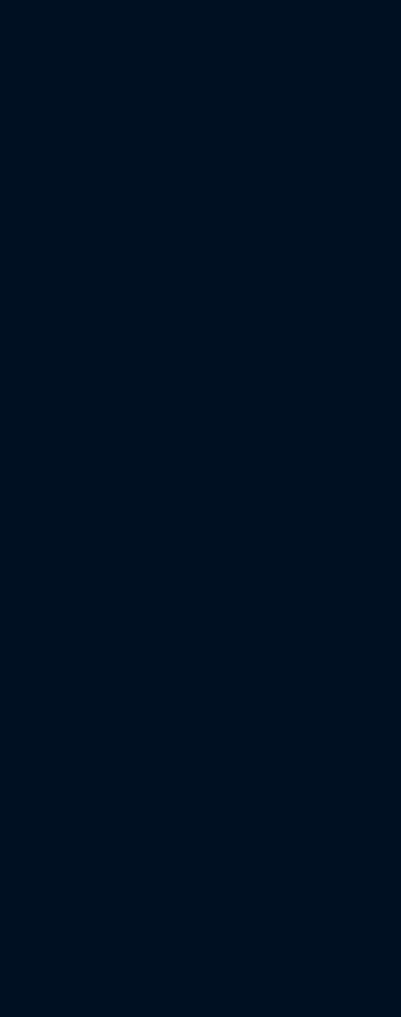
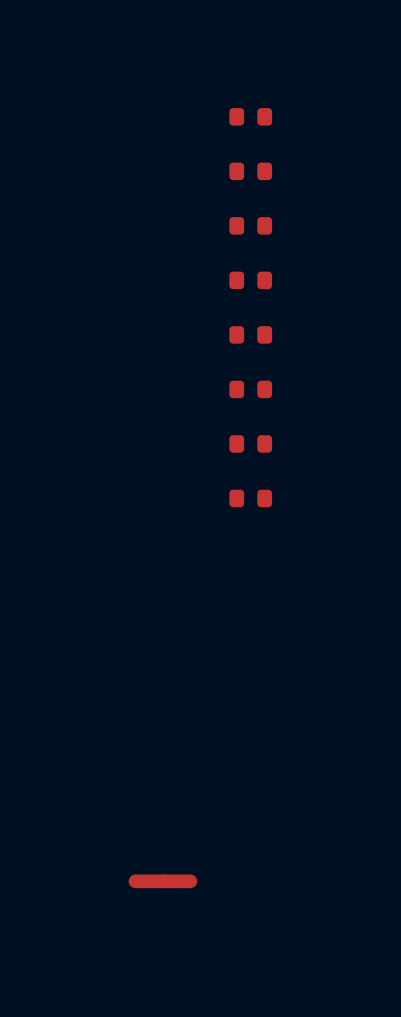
part: none -> (250, 116)
part: none -> (250, 171)
part: none -> (250, 225)
part: none -> (250, 280)
part: none -> (250, 334)
part: none -> (250, 389)
part: none -> (250, 443)
part: none -> (250, 498)
part: none -> (162, 881)

